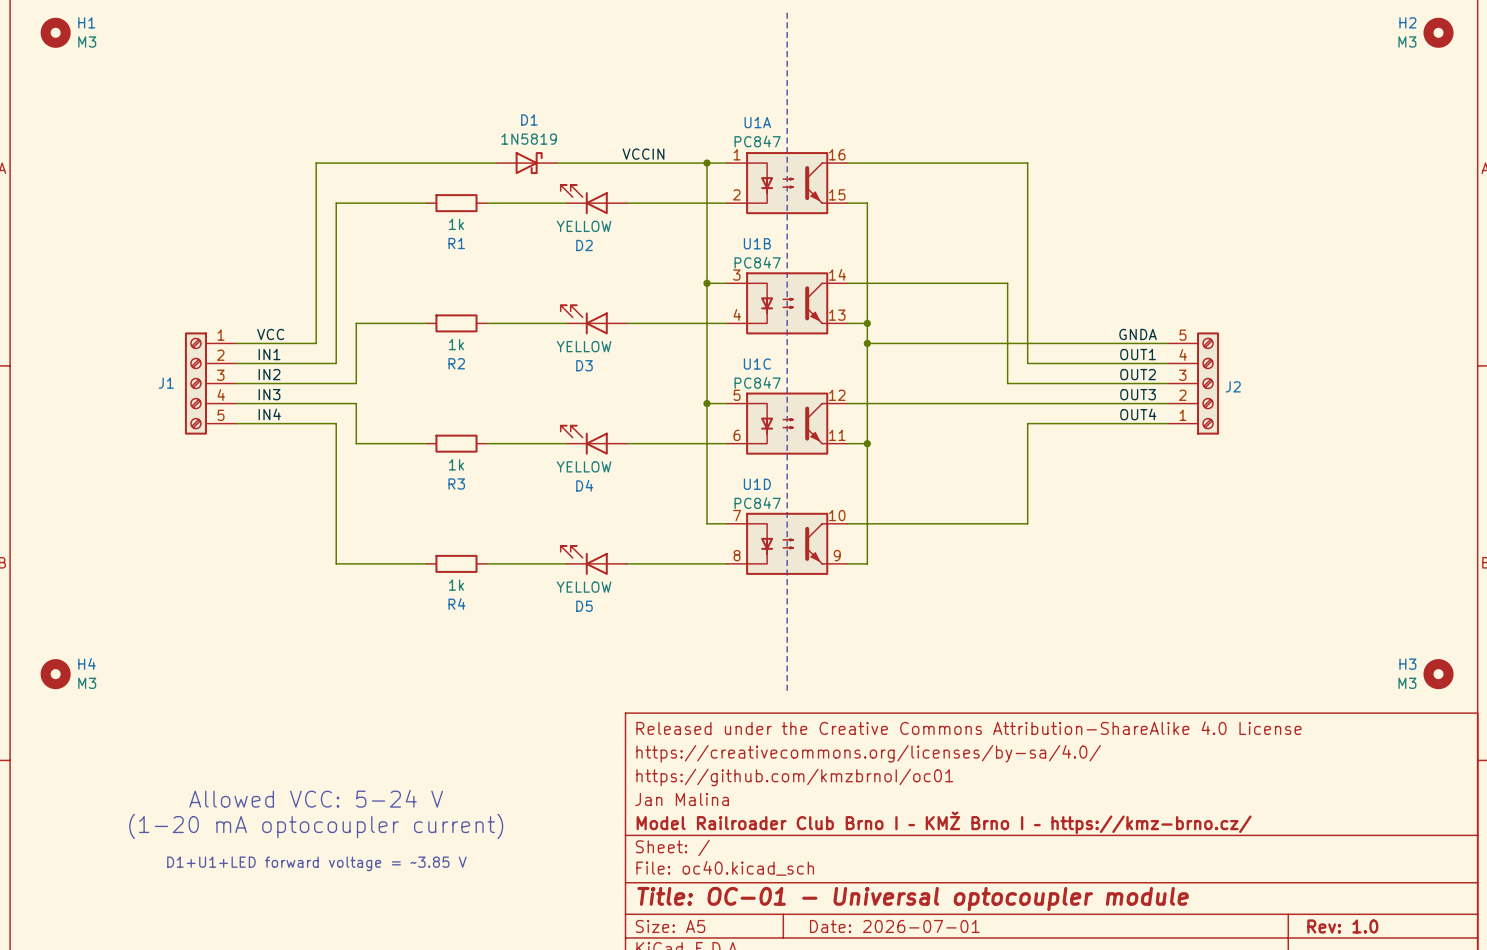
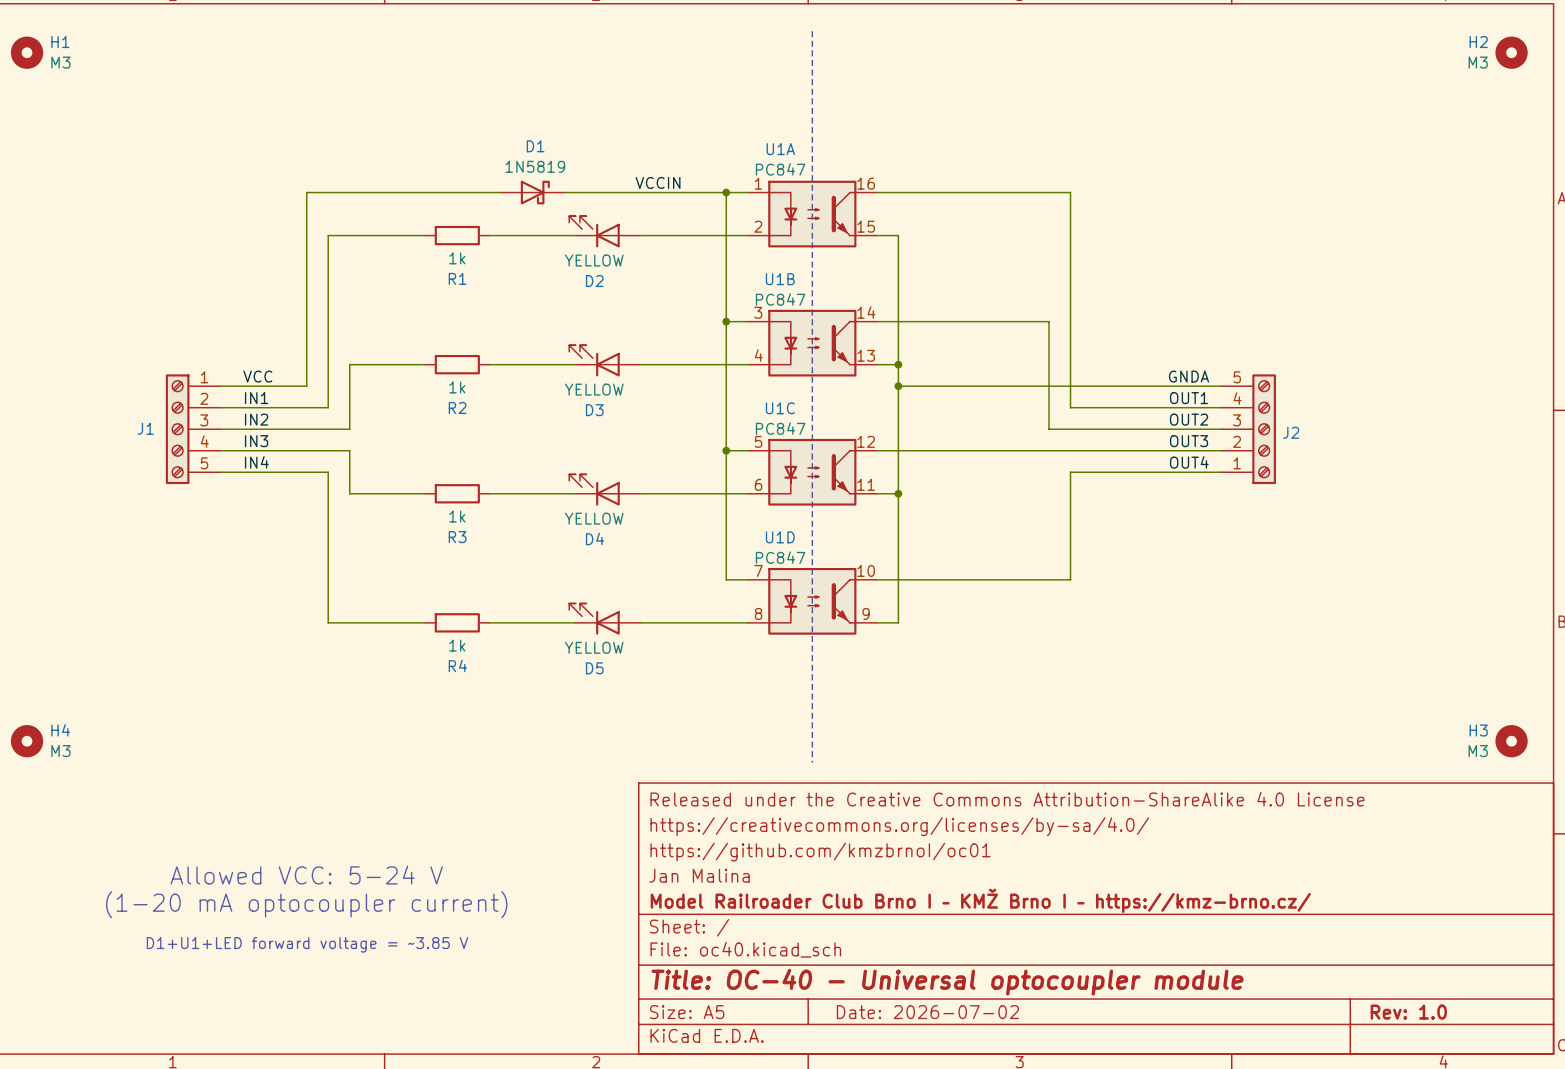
title block: Title: OC-01 - Universal optocoupler module (913, 898) -> Title: OC-40 - Universal optocoupler module (947, 982)
title block: Date: 2026-07-01 (894, 926) -> Date: 2026-07-02 (927, 1012)

